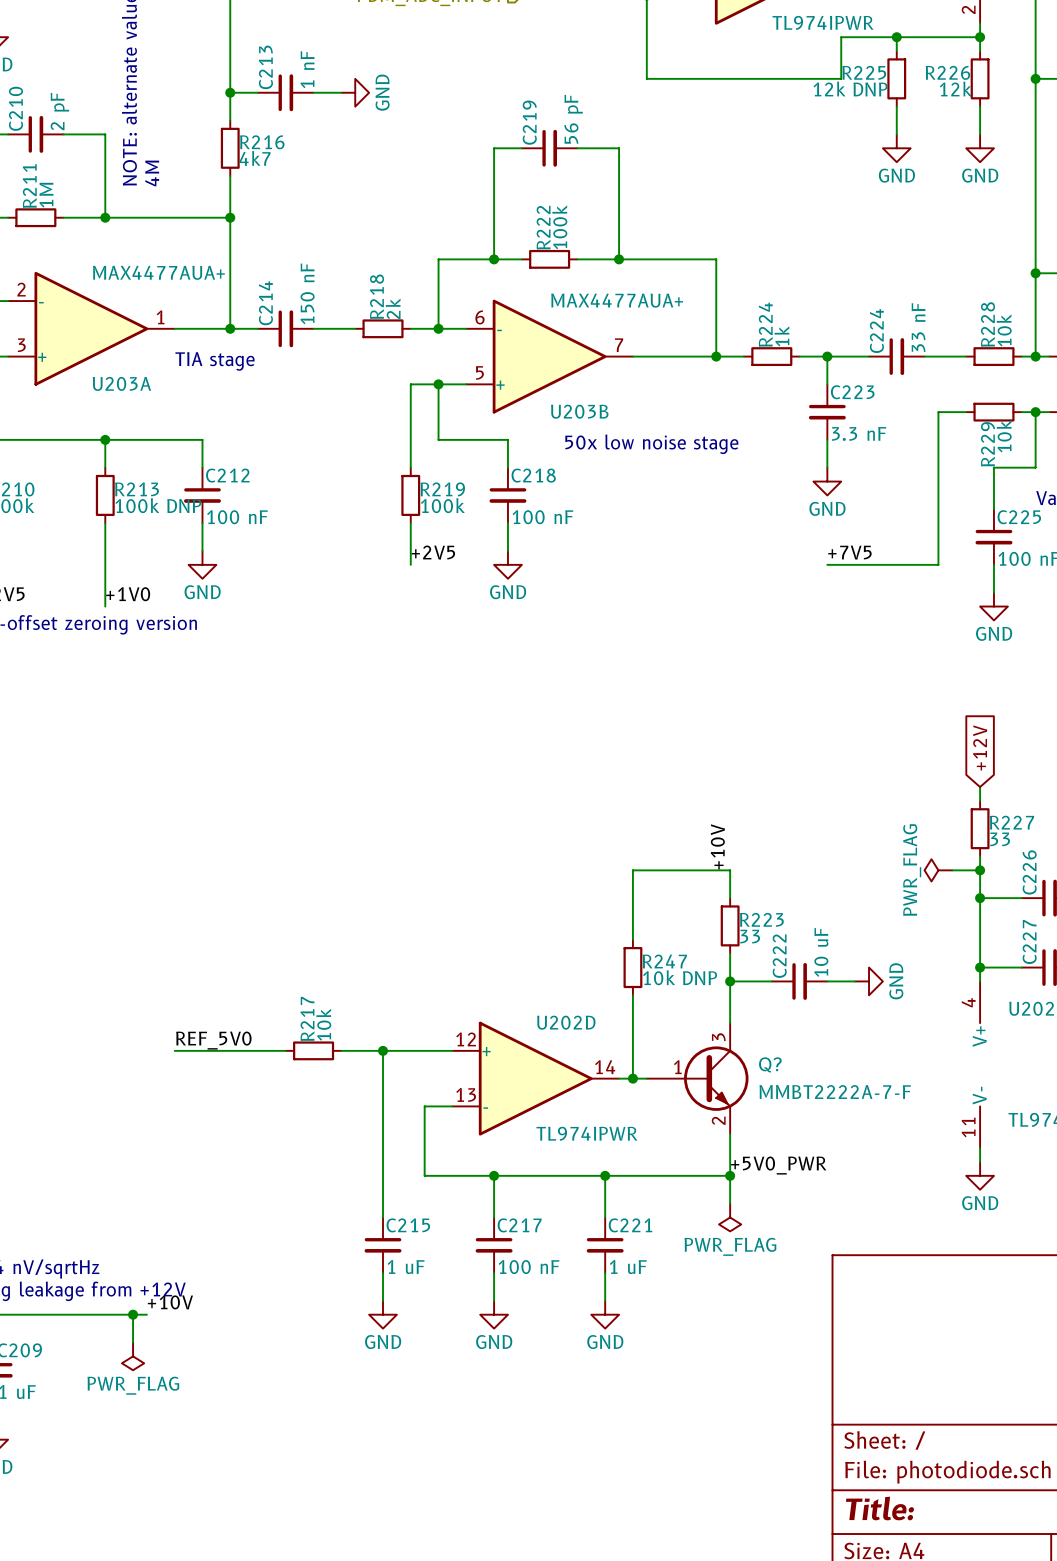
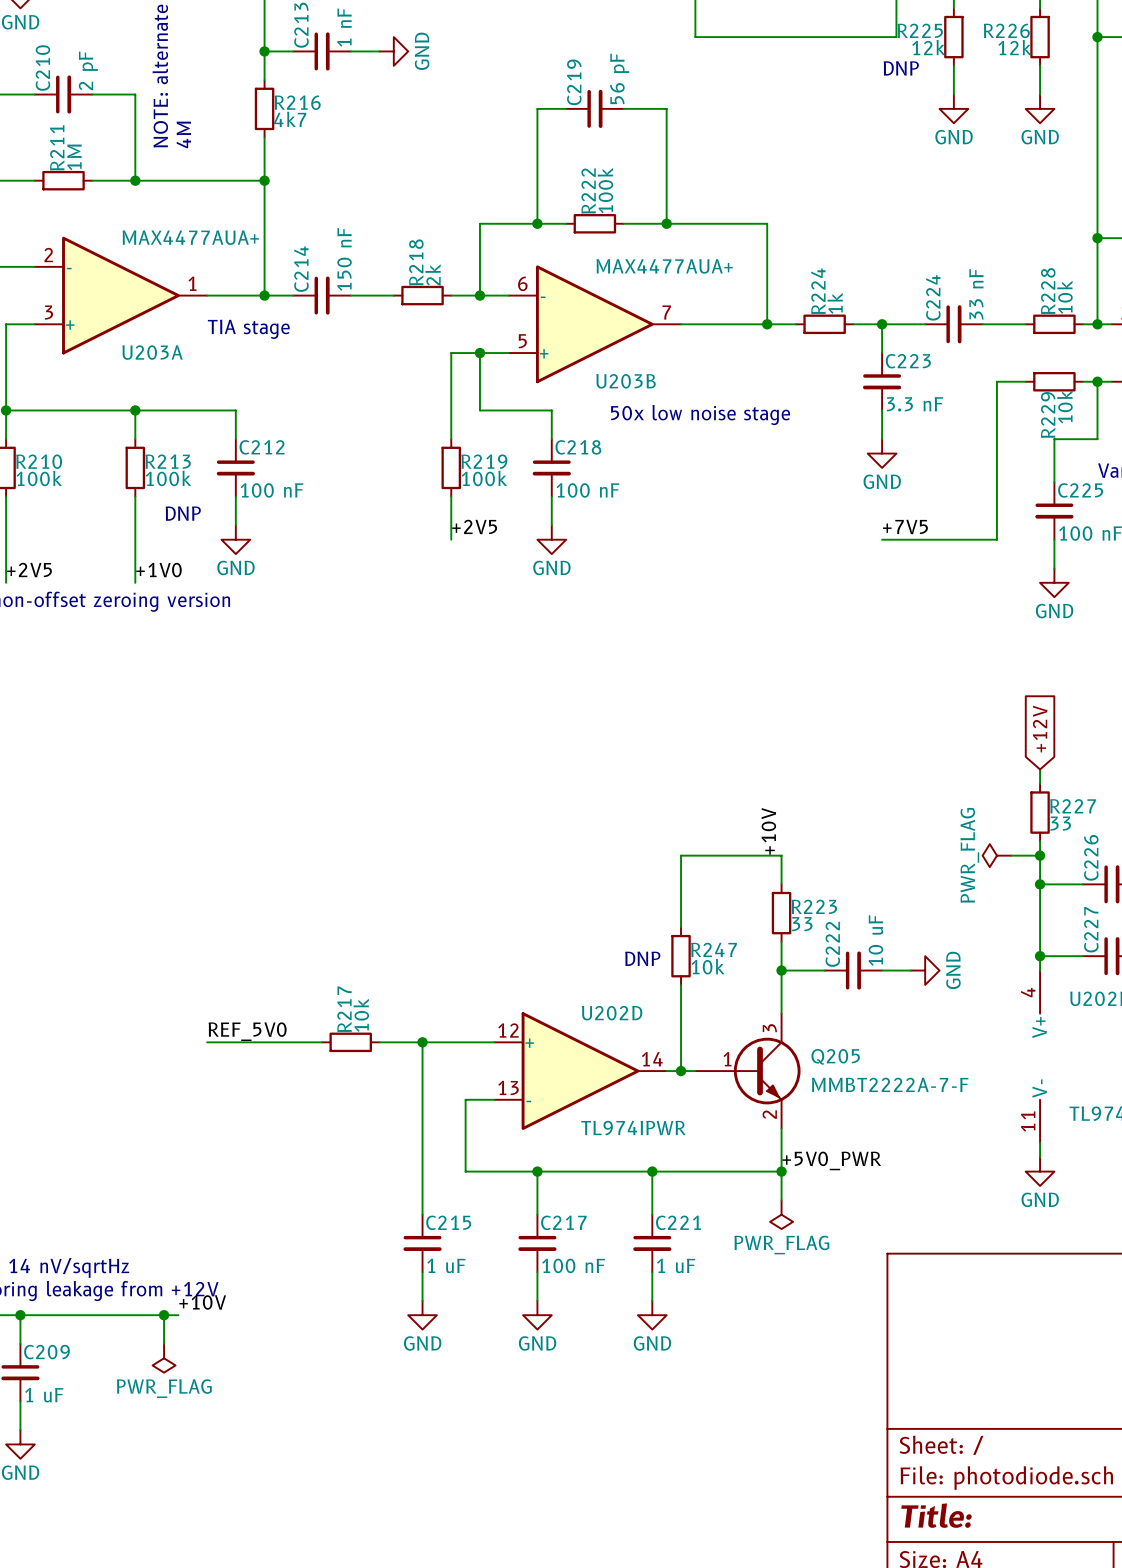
R225 value: 12k DNP (850, 89) -> 12k (928, 47)
text: none -> DNP (901, 68)
R213 value: 100k DNP (158, 505) -> 100k (168, 478)
text: none -> DNP (183, 513)
text: none -> DNP (642, 958)
R247 value: 10k DNP (680, 977) -> 10k (708, 966)
Q? name: Q? (770, 1064) -> Q205 (835, 1056)

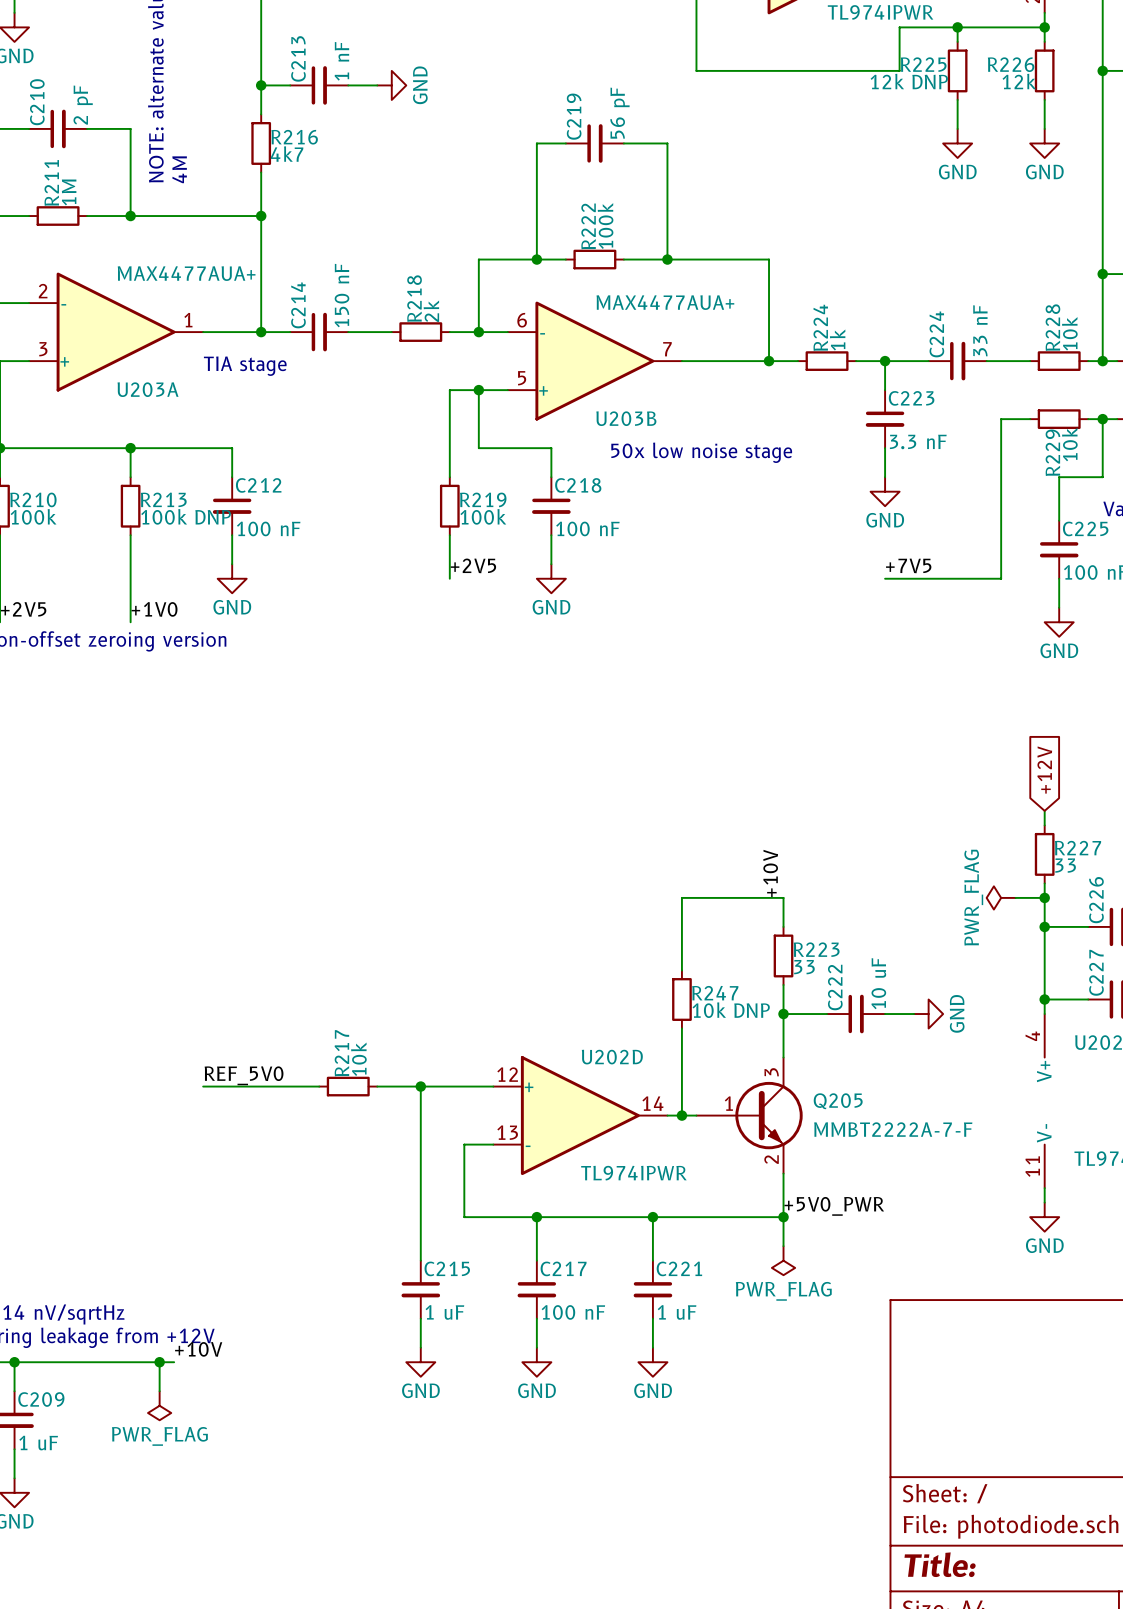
R225 value: 12k (928, 47) -> 12k DNP (909, 81)
text: DNP (901, 68) -> none
R213 value: 100k (168, 478) -> 100k DNP (186, 516)
text: DNP (183, 513) -> none
text: DNP (642, 958) -> none
R247 value: 10k (708, 966) -> 10k DNP (731, 1010)

